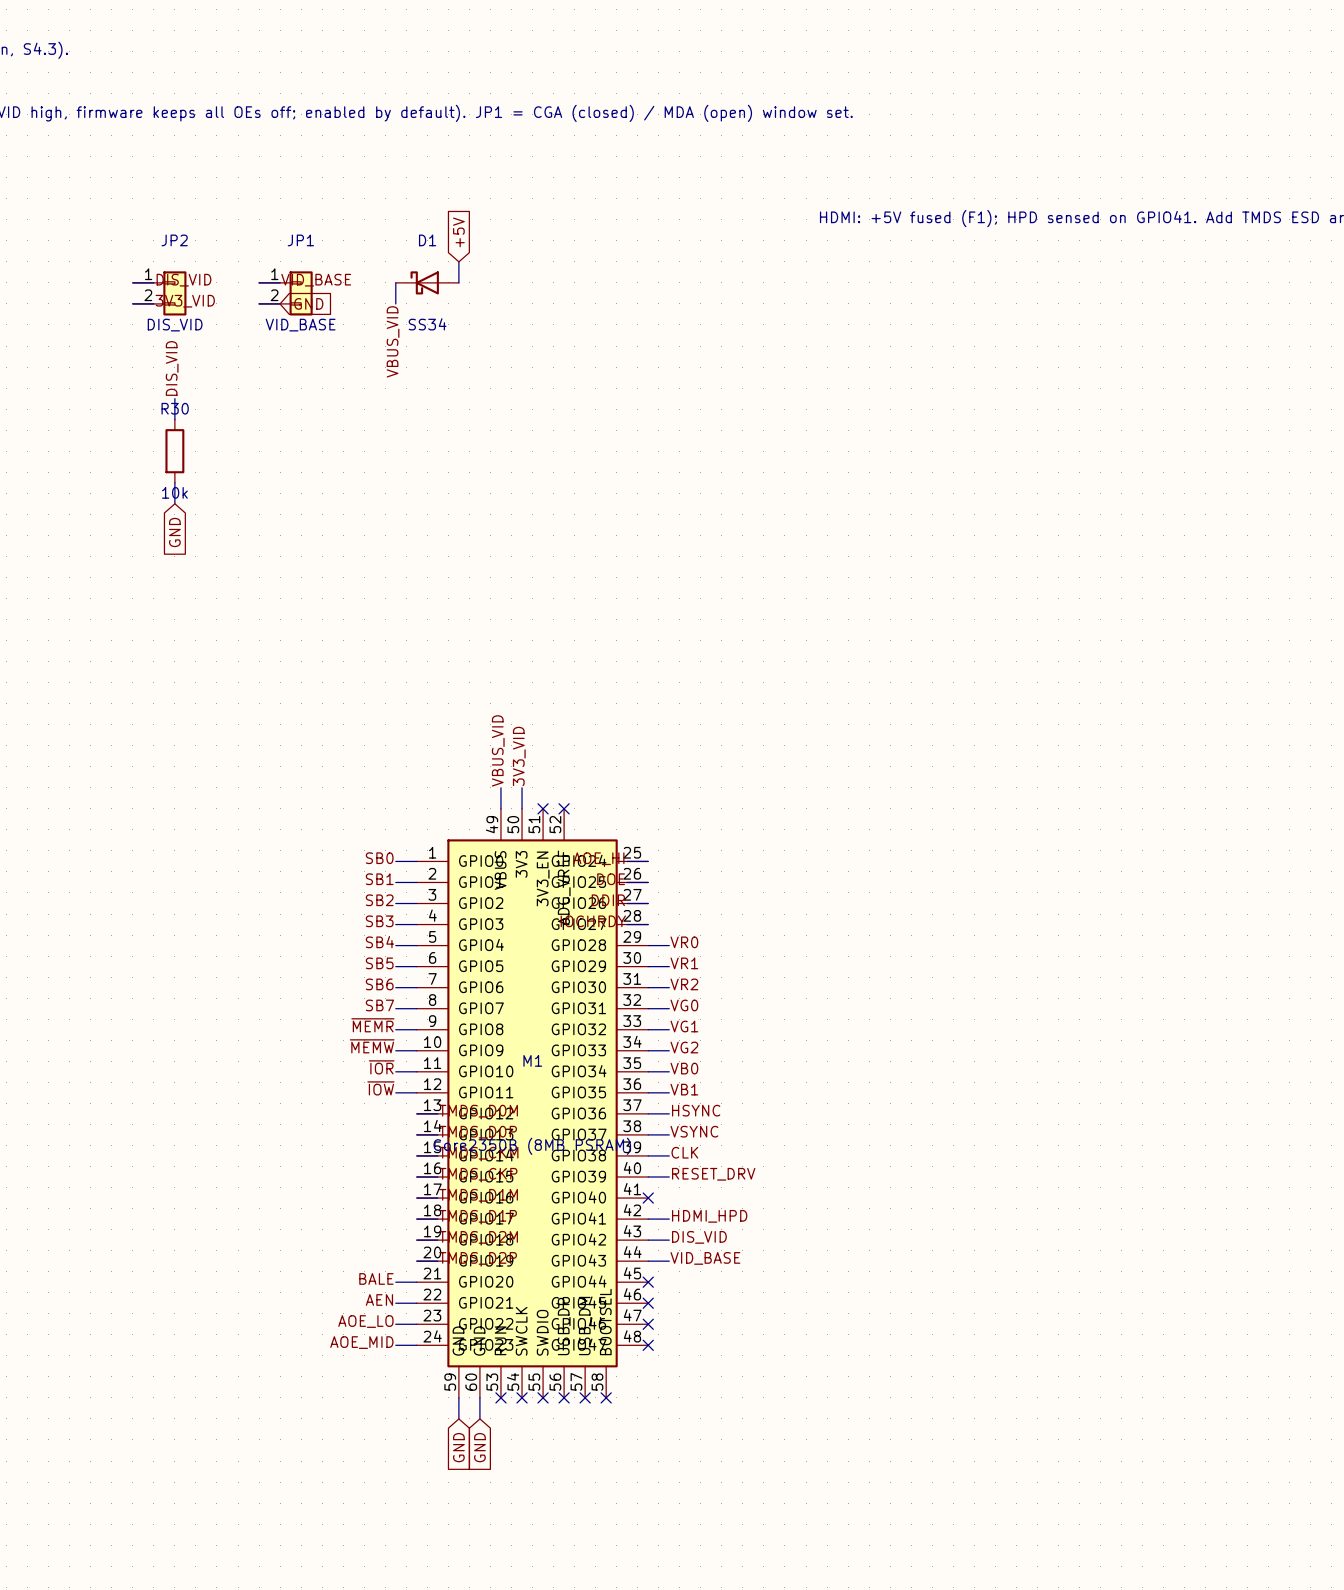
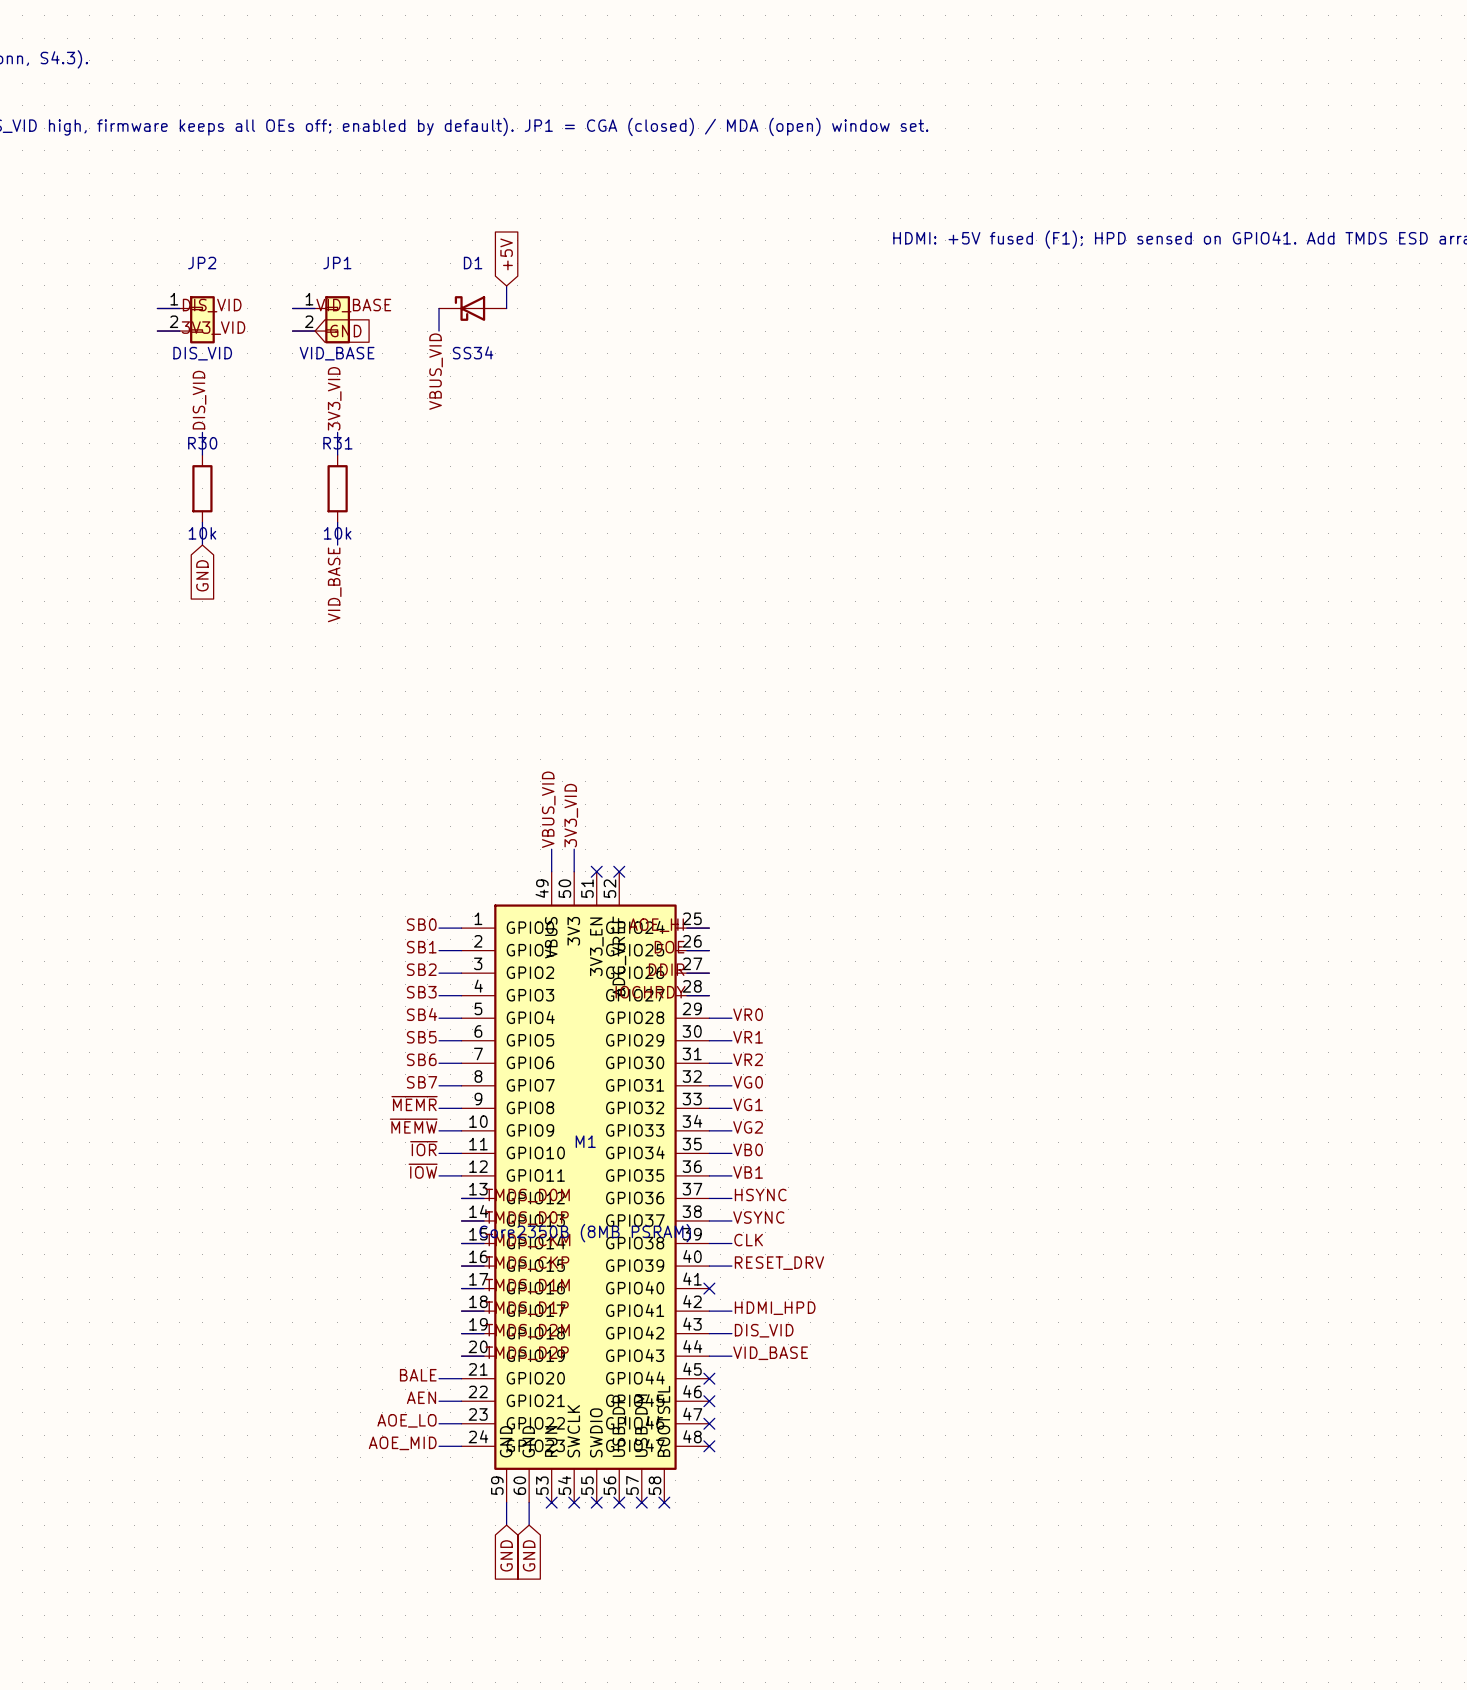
label: none -> 3V3_VID (334, 398)
wire: none -> (337, 432) (337, 454)
R31: none -> 10k (337, 488)
wire: none -> (337, 522) (337, 545)
label: none -> VID_BASE (334, 584)

